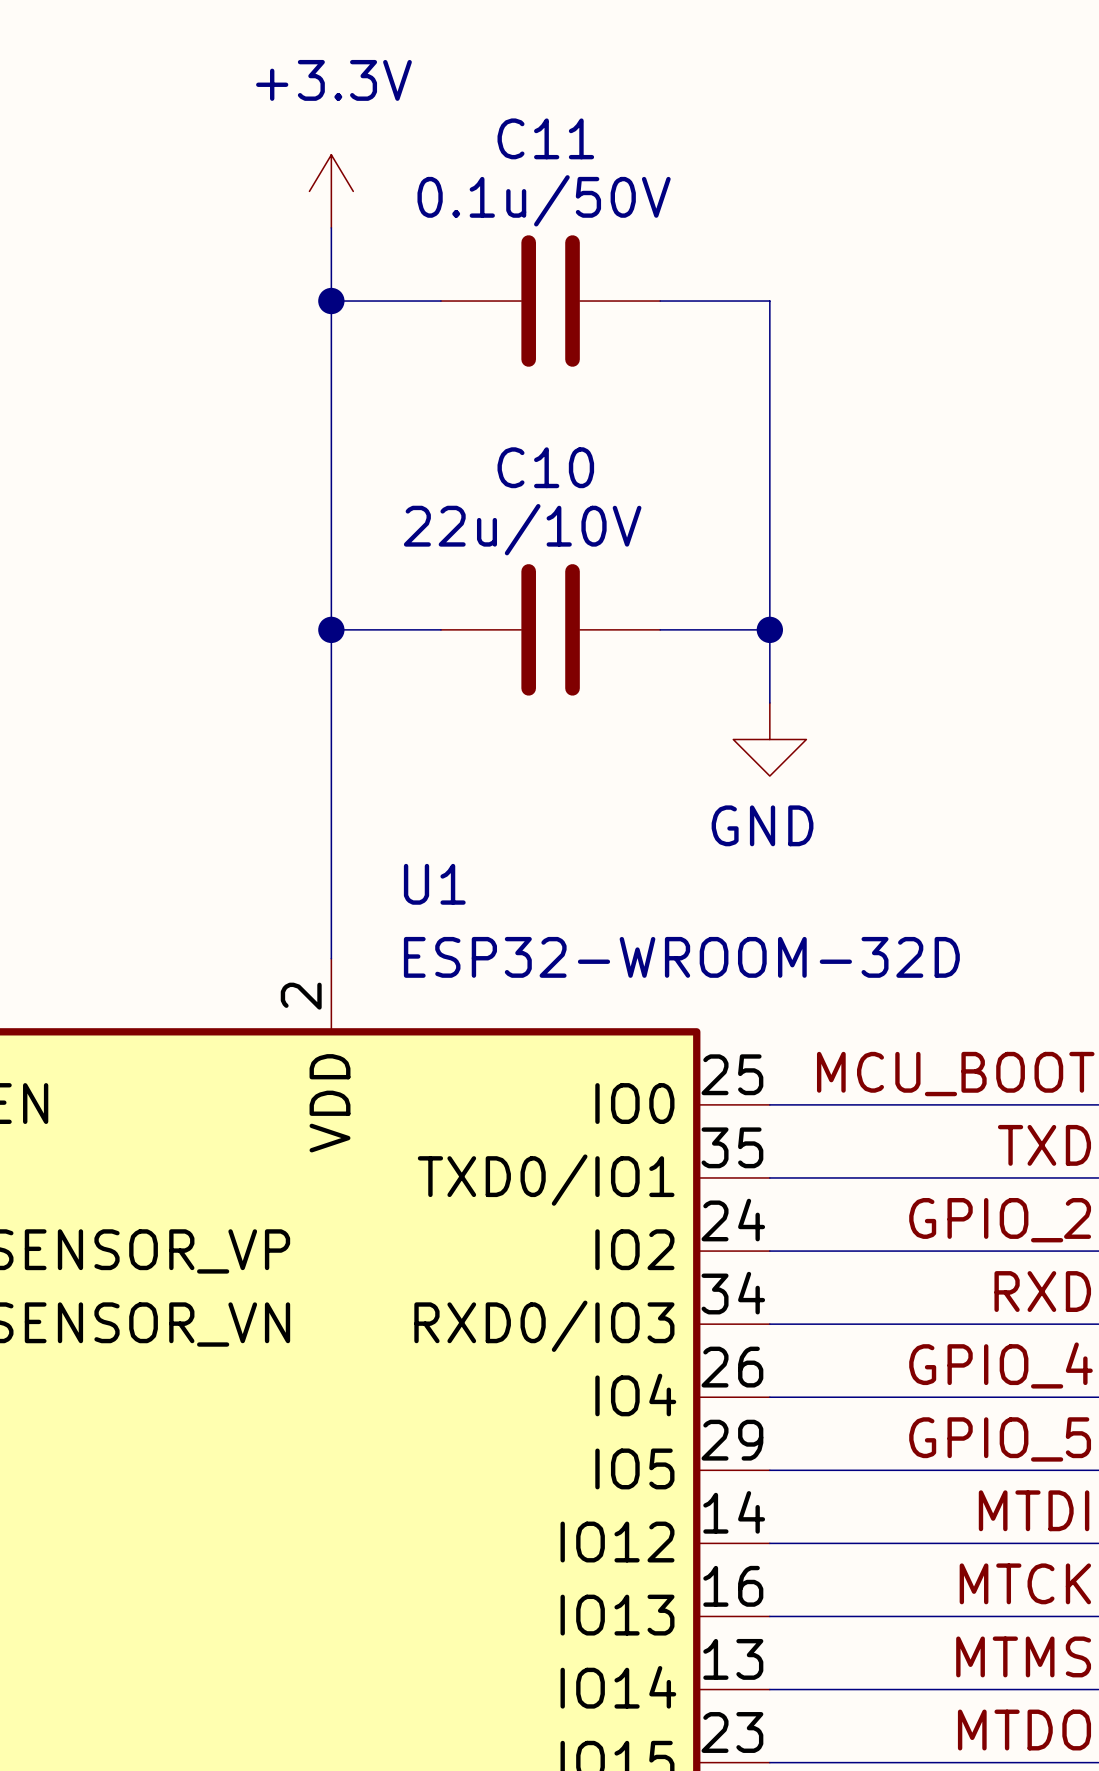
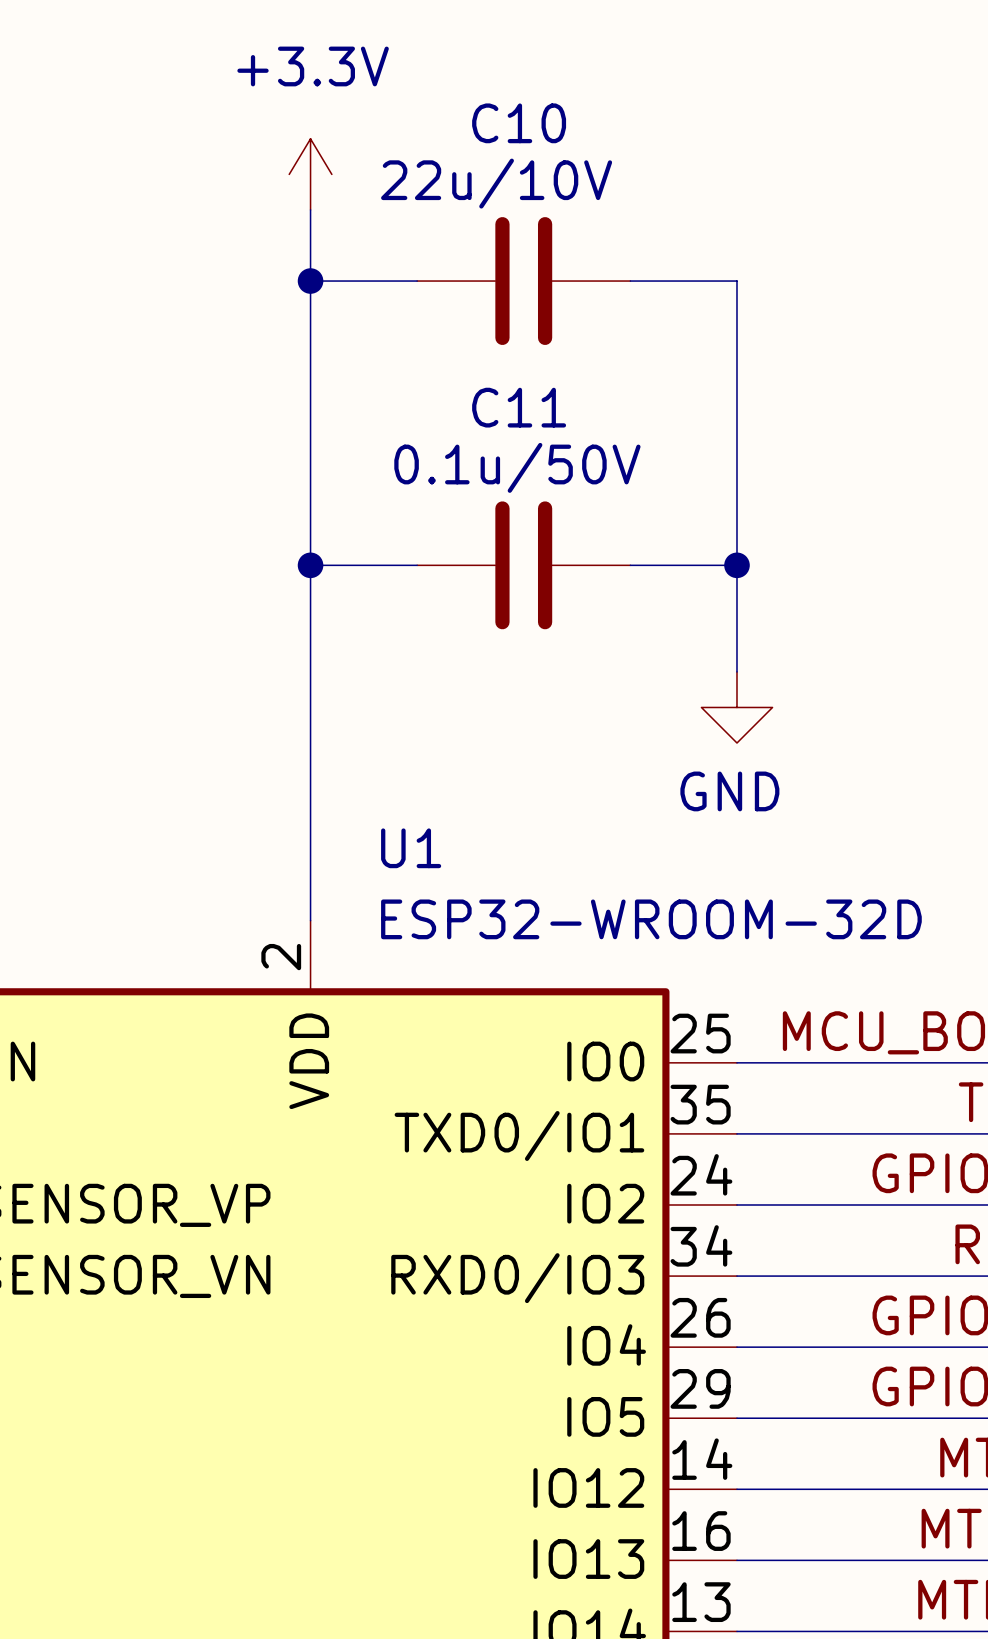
C11 name: C11 (545, 138) -> C10 (519, 123)
C11 value: 0.1u/50V (544, 200) -> 22u/10V (496, 183)
C11: none -> 0.1u/50V (523, 565)
wire: (331, 629) (440, 629) -> (310, 565) (417, 565)
junction position: (331, 629) -> (310, 565)
C10: 22u/10V (550, 629) -> none
wire: (660, 629) (769, 629) -> (630, 565) (736, 565)
junction position: (769, 629) -> (736, 565)

